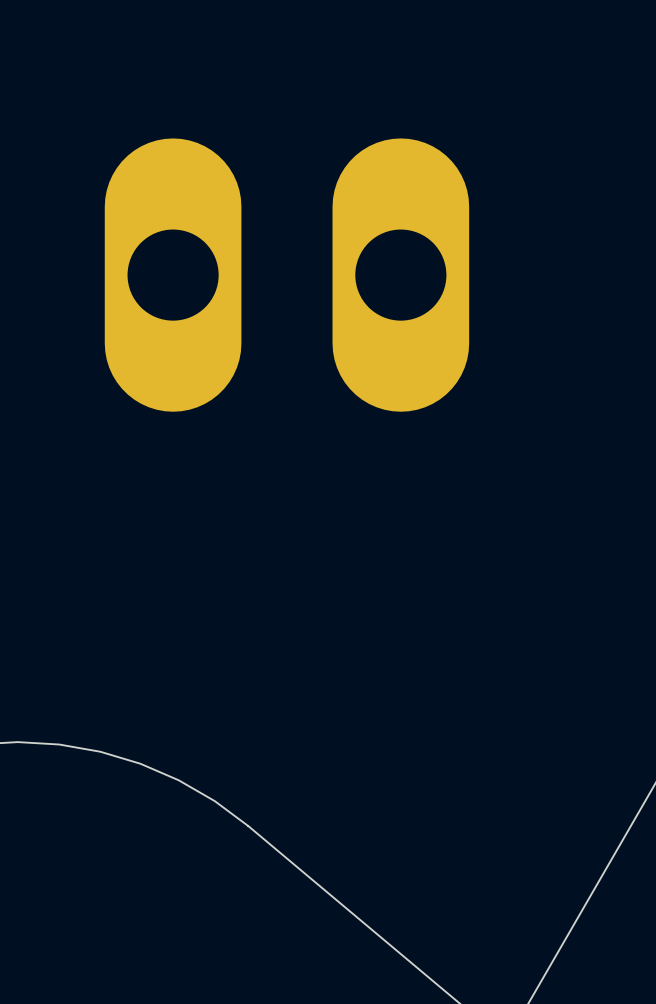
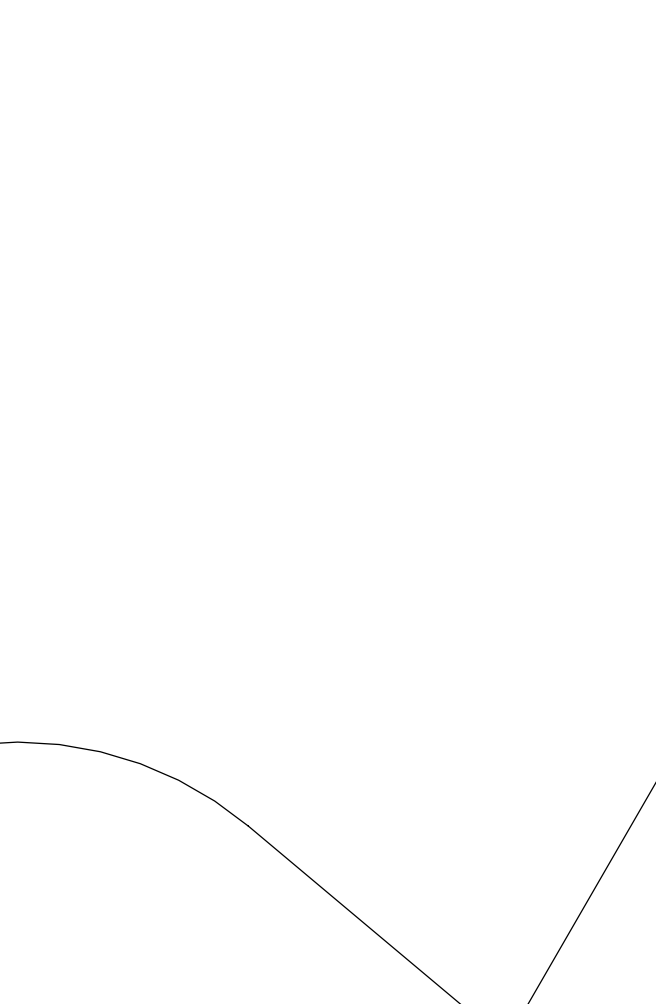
part: (286, 275) -> none

